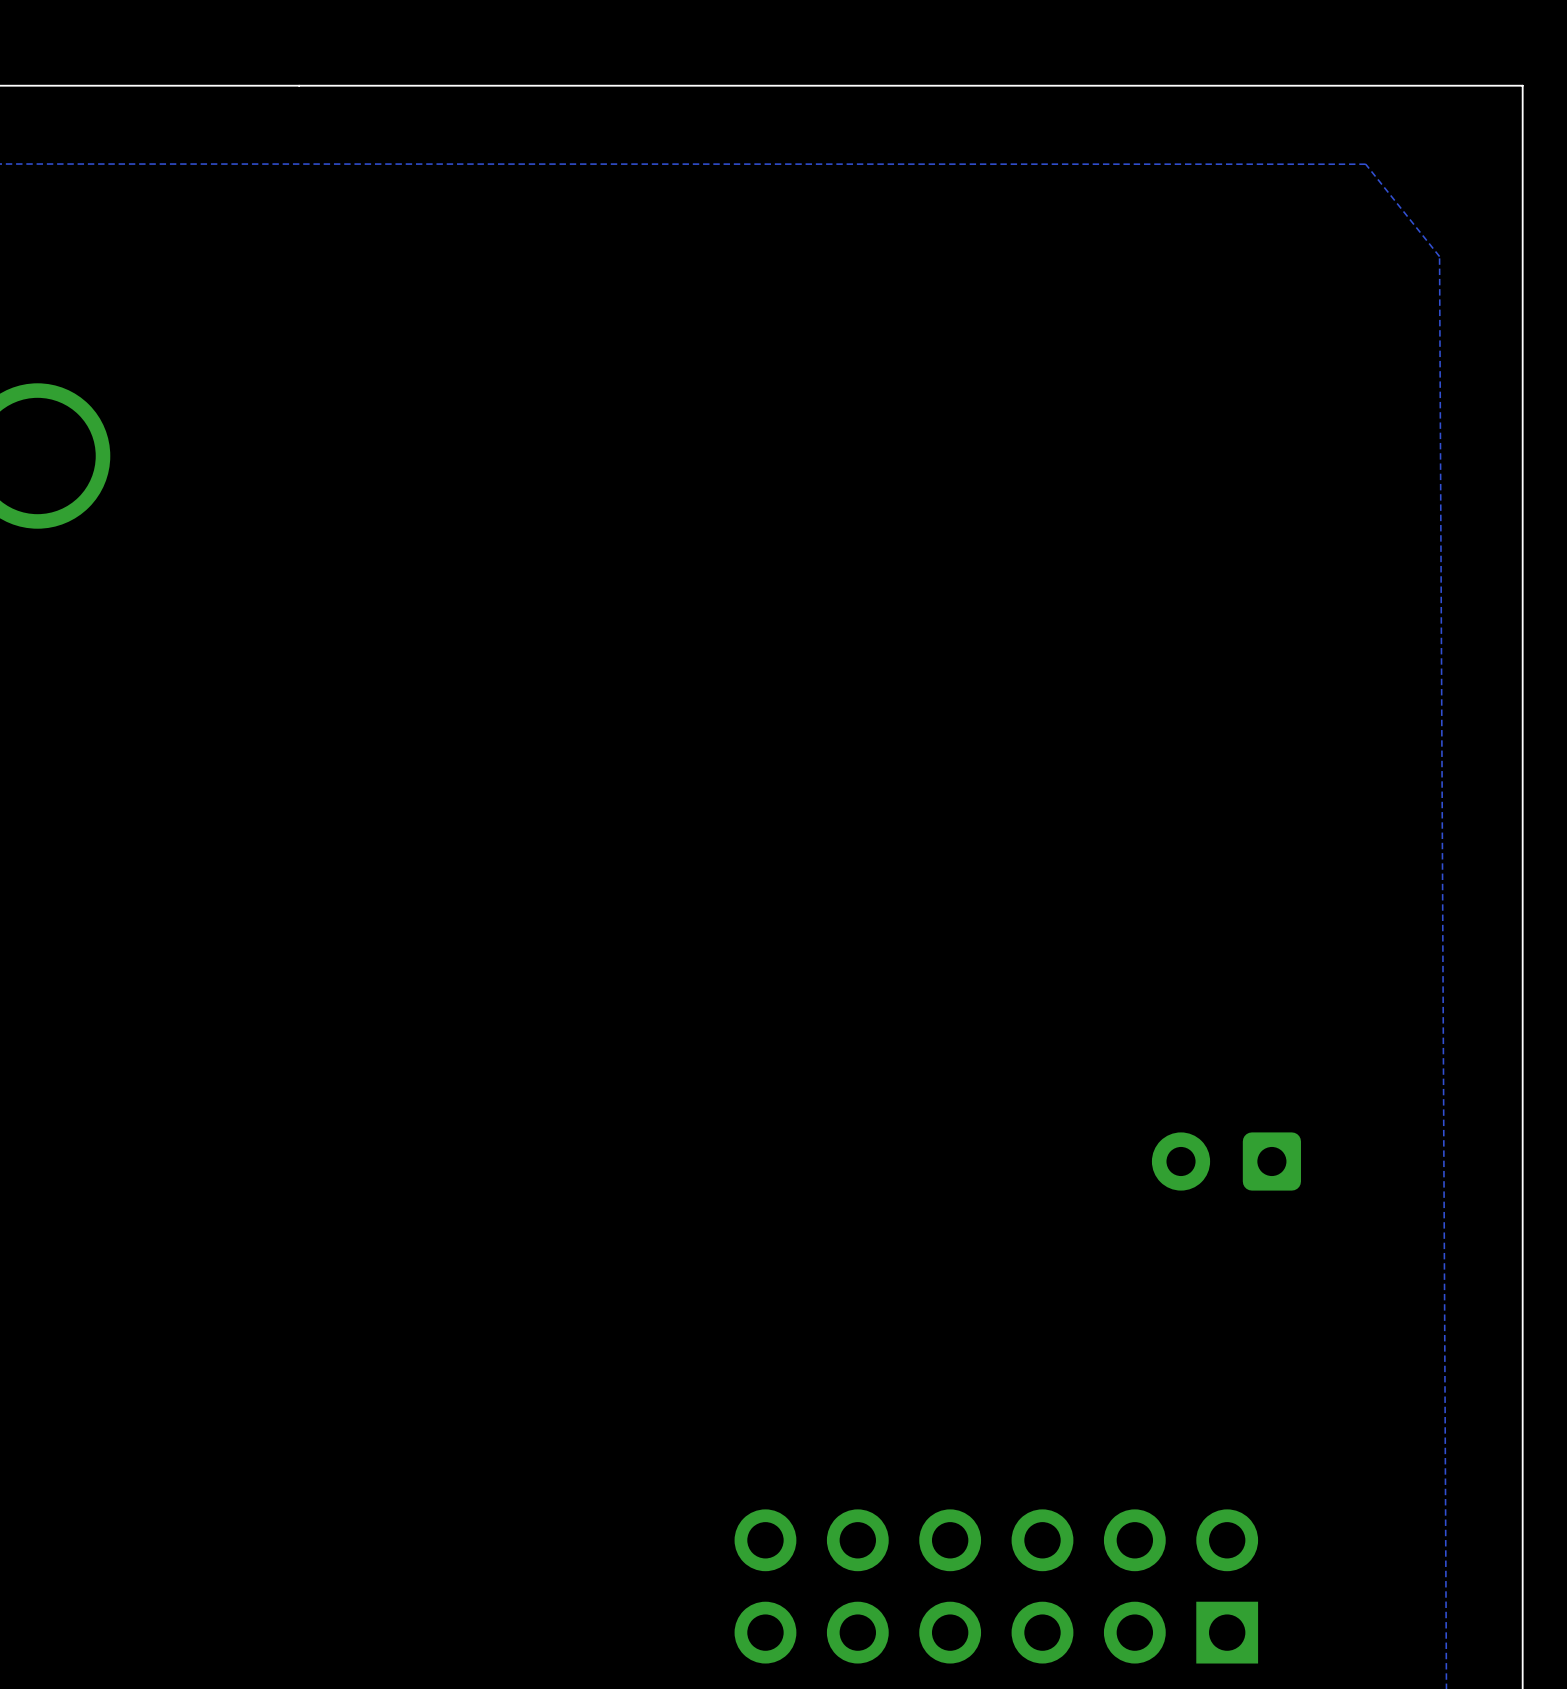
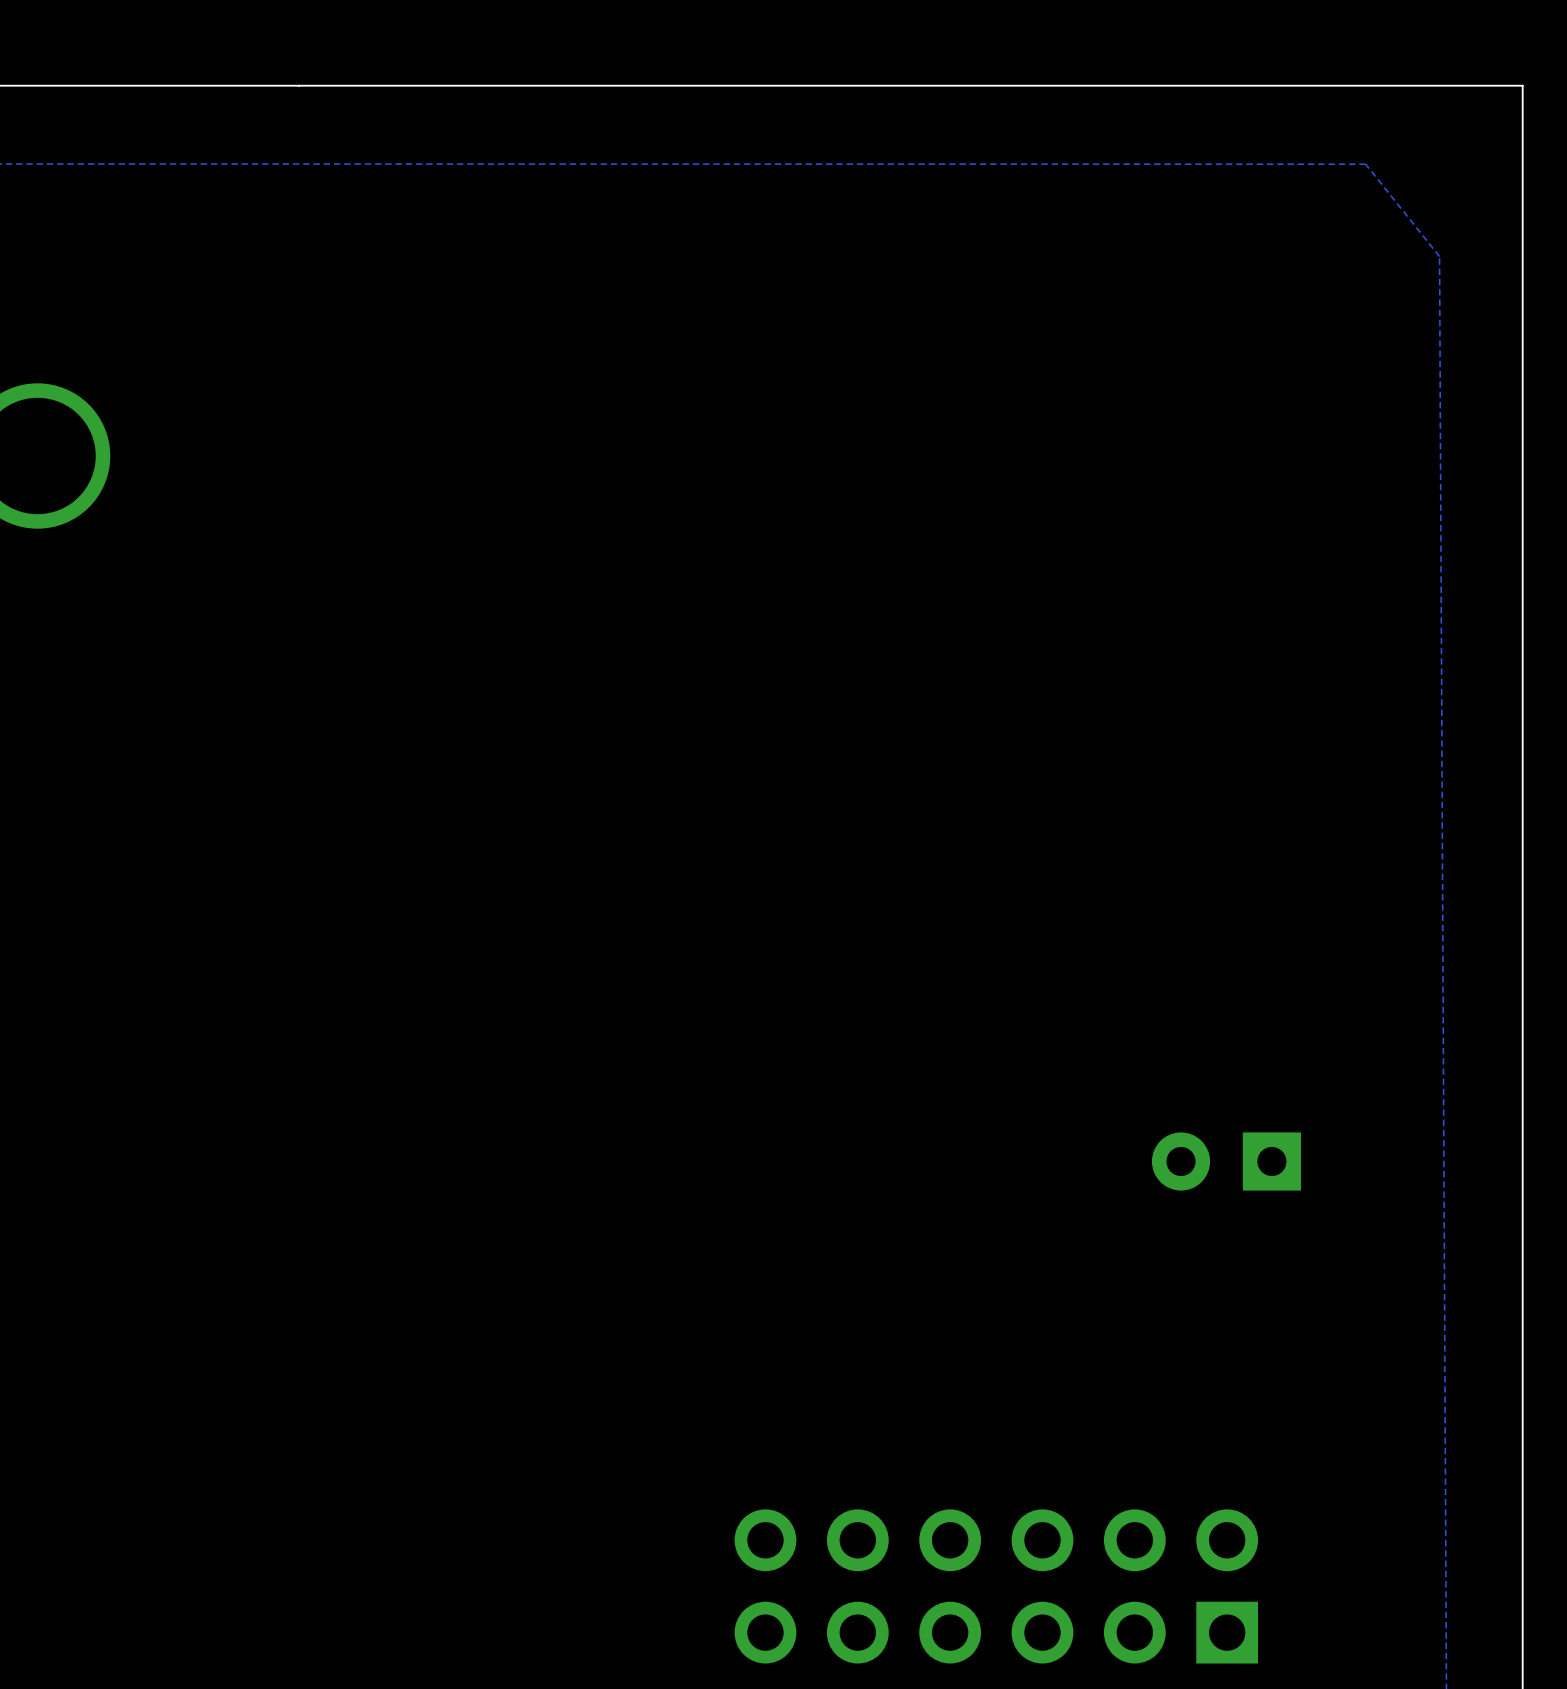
part footprint: [1151, 1132, 1301, 1191] -> [1151, 1132, 1301, 1191]

